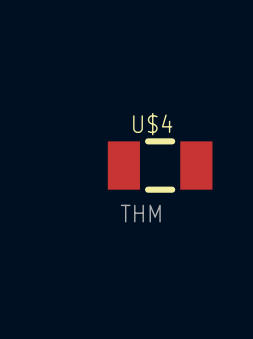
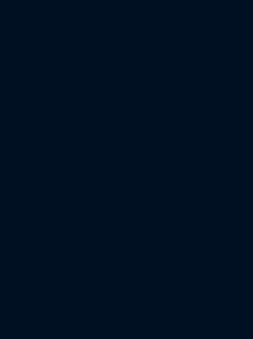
U$4: THM (160, 165) -> none

